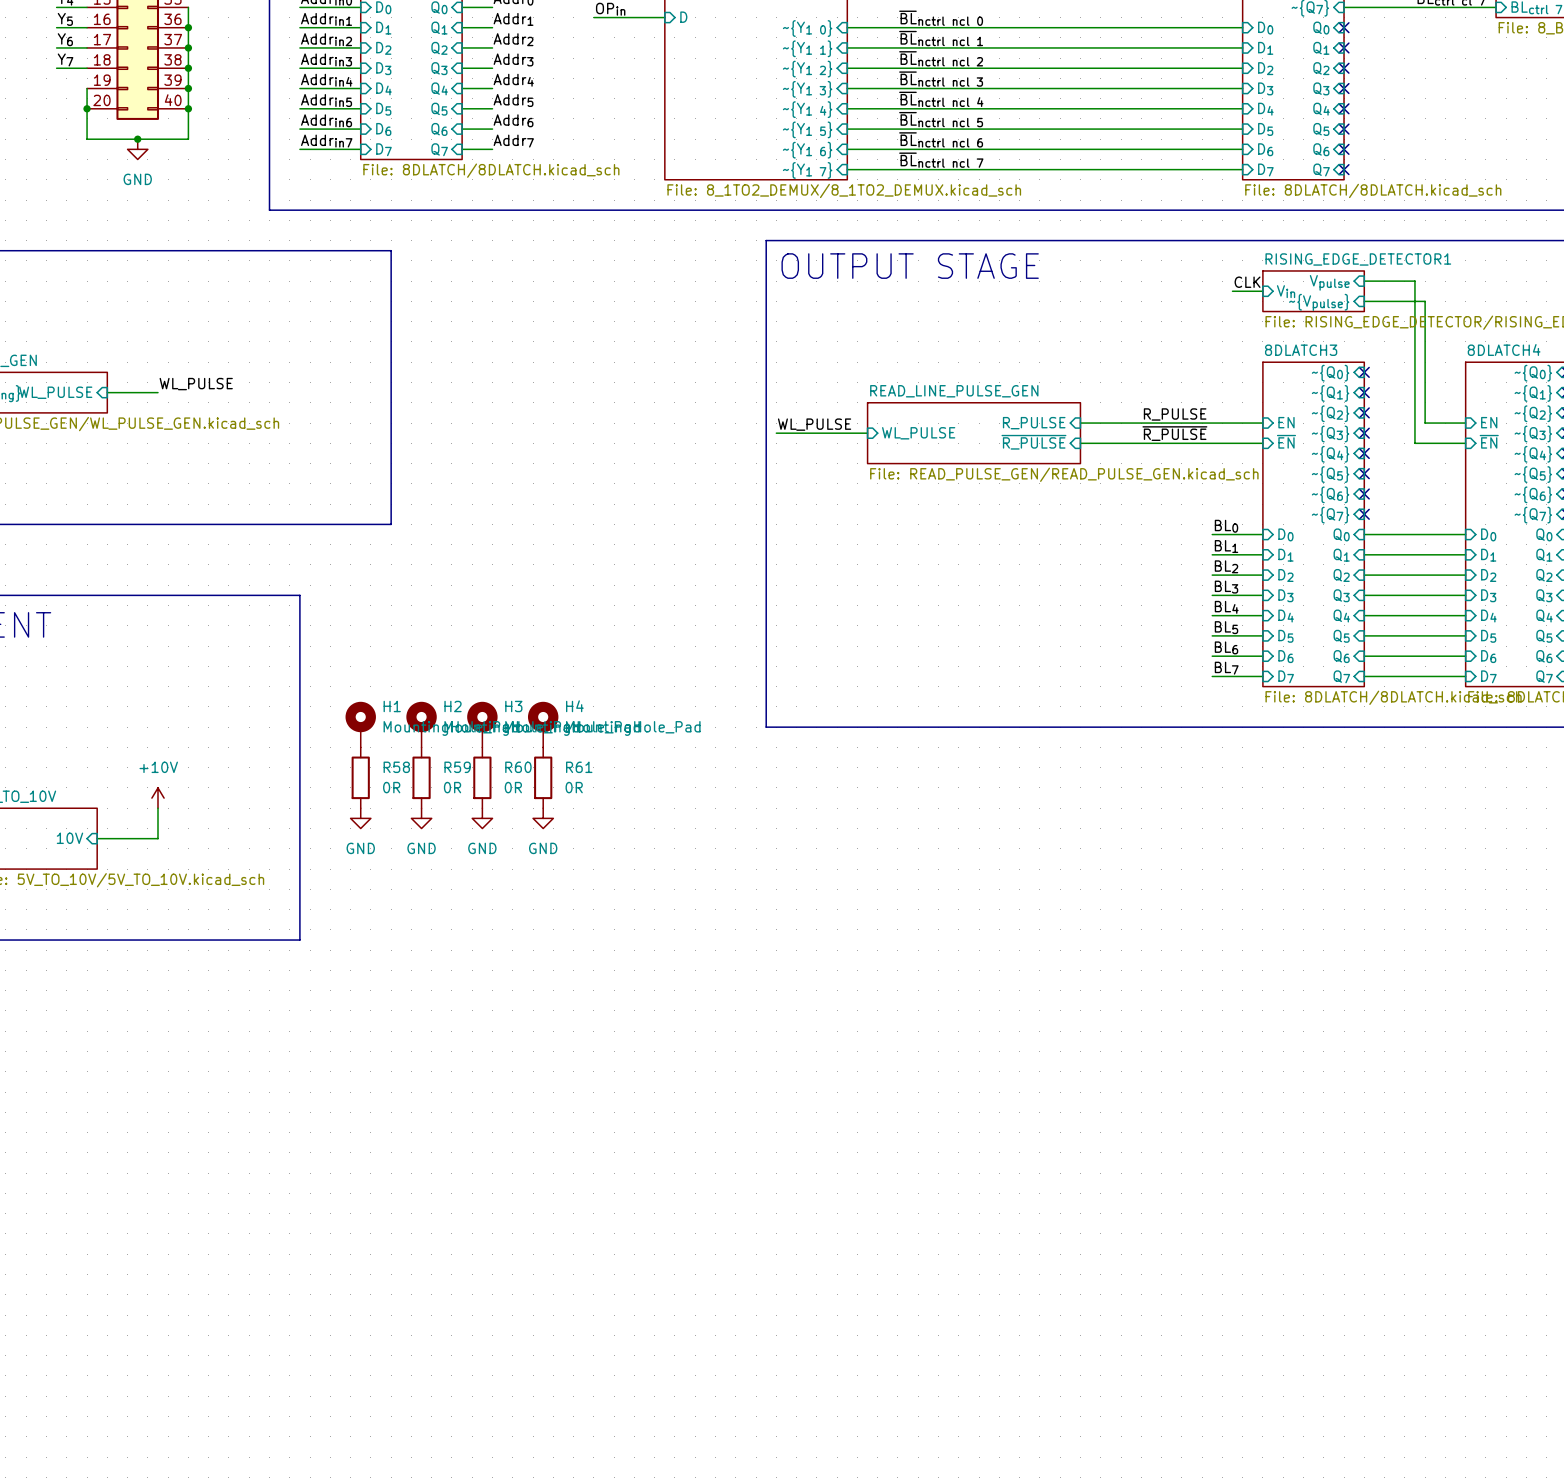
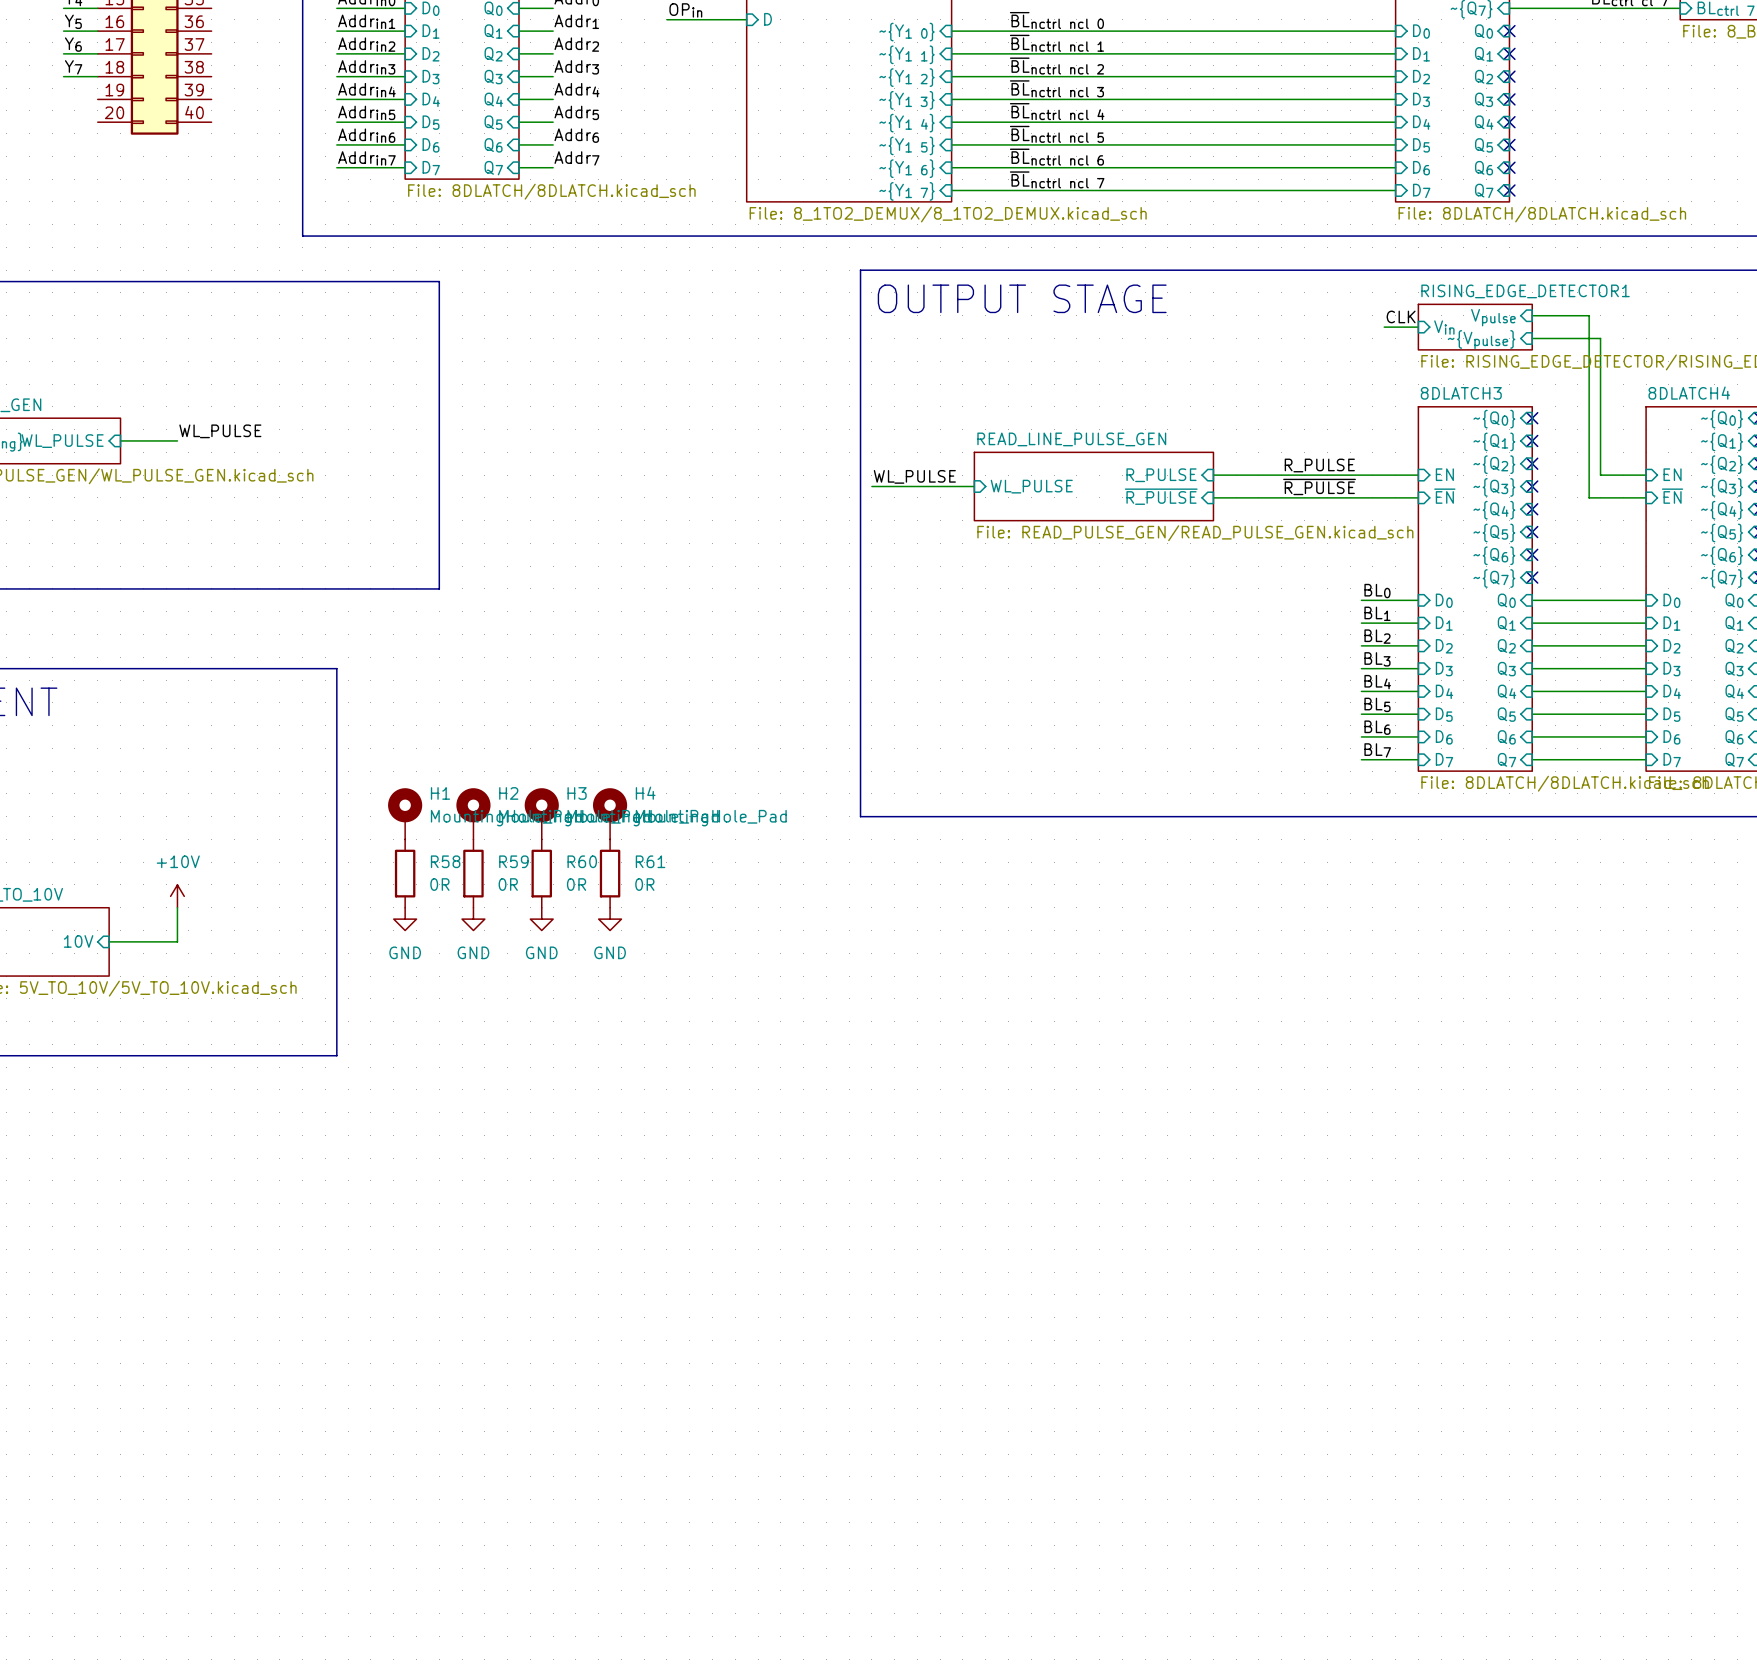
wire: (188, 7) (188, 139) (87, 139) (87, 88) -> none
junction: (188, 27) -> none
junction: (188, 47) -> none
junction: (188, 68) -> none
junction: (188, 88) -> none
junction: (87, 108) -> none
junction: (188, 108) -> none
junction: (137, 139) -> none
power symbol: GND (137, 149) -> none

